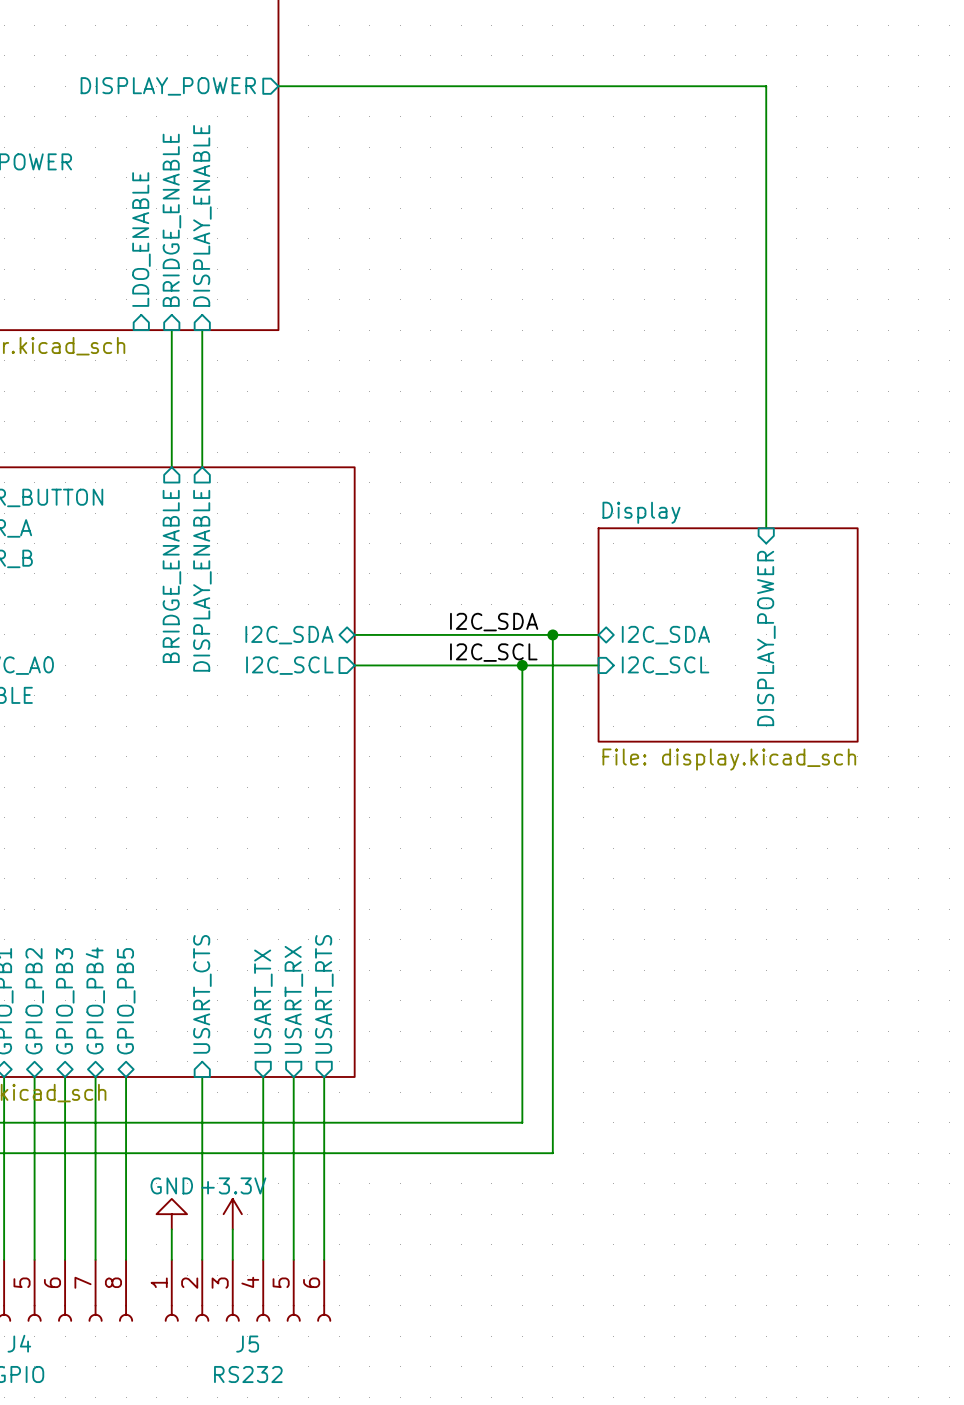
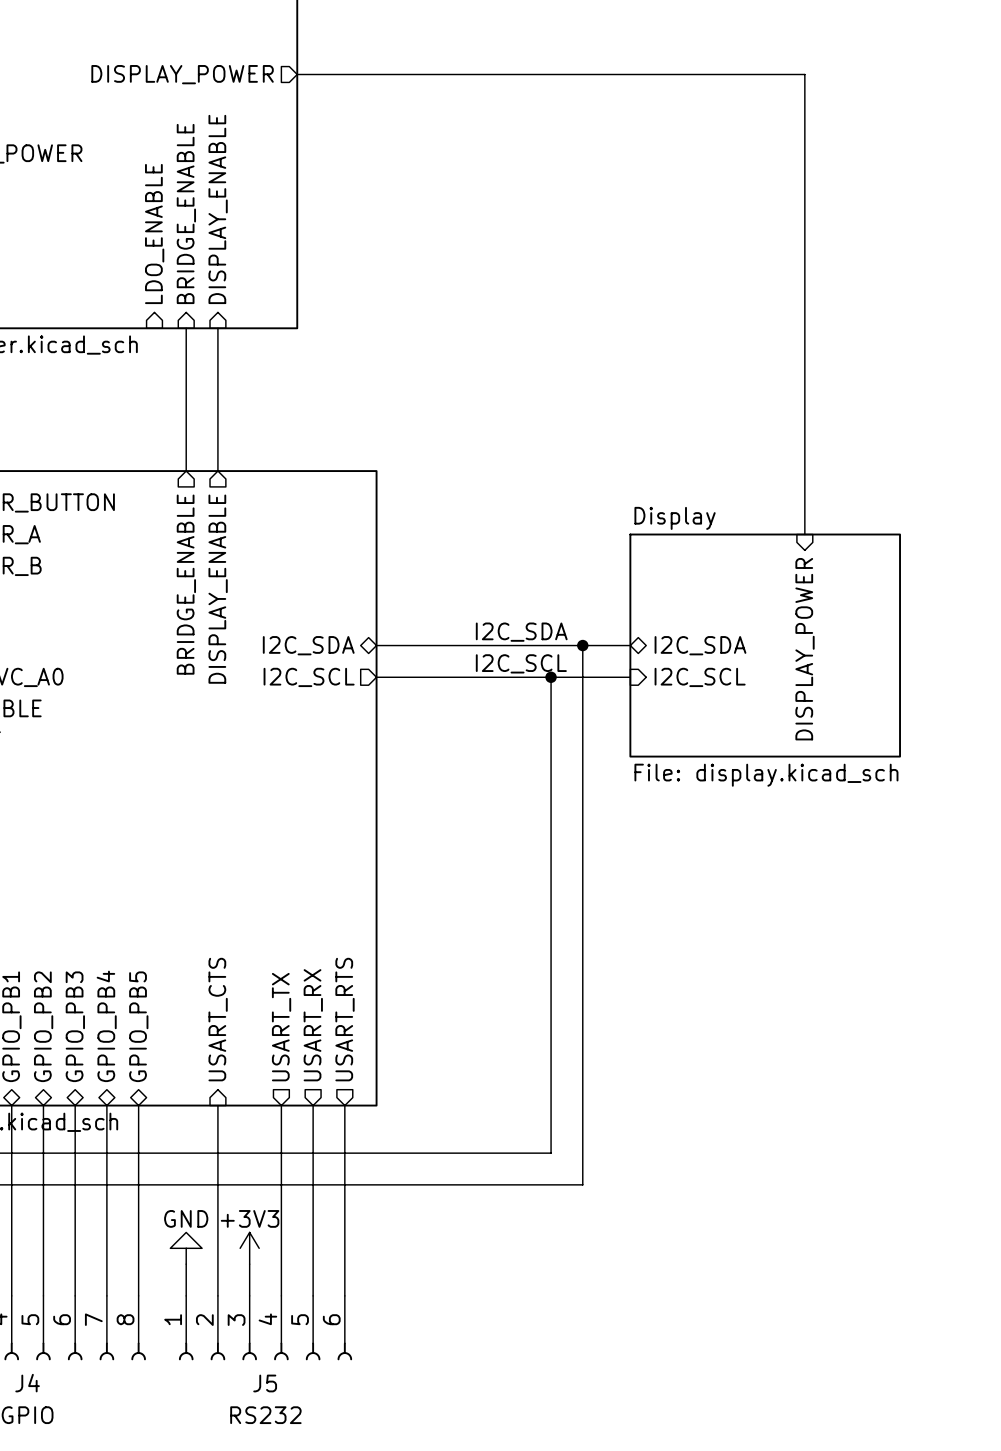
power symbol: +3.3V (232, 1214) -> +3V3 (249, 1248)

